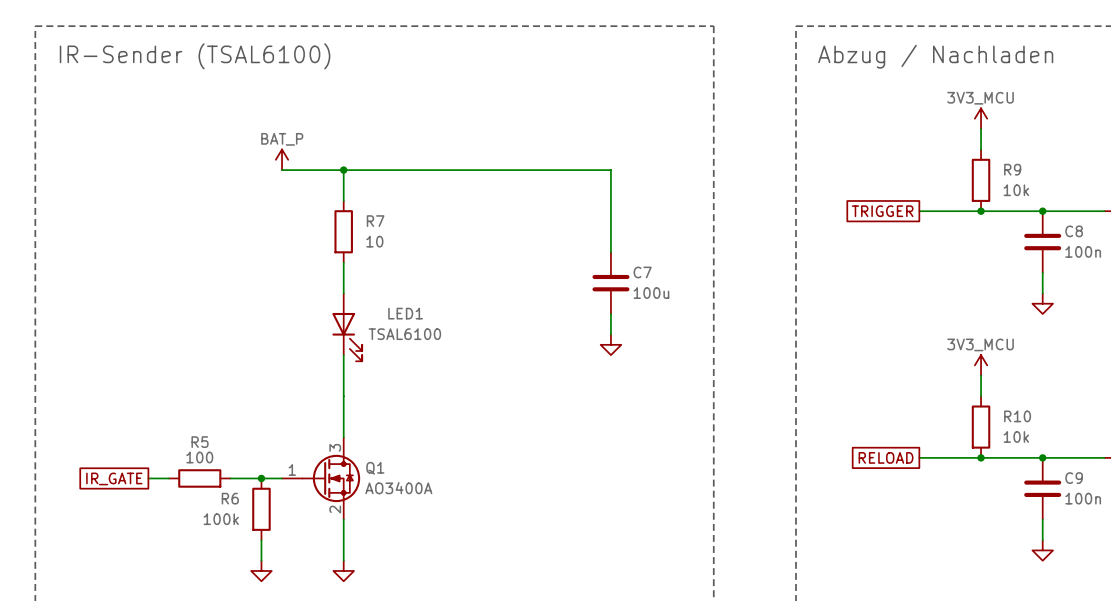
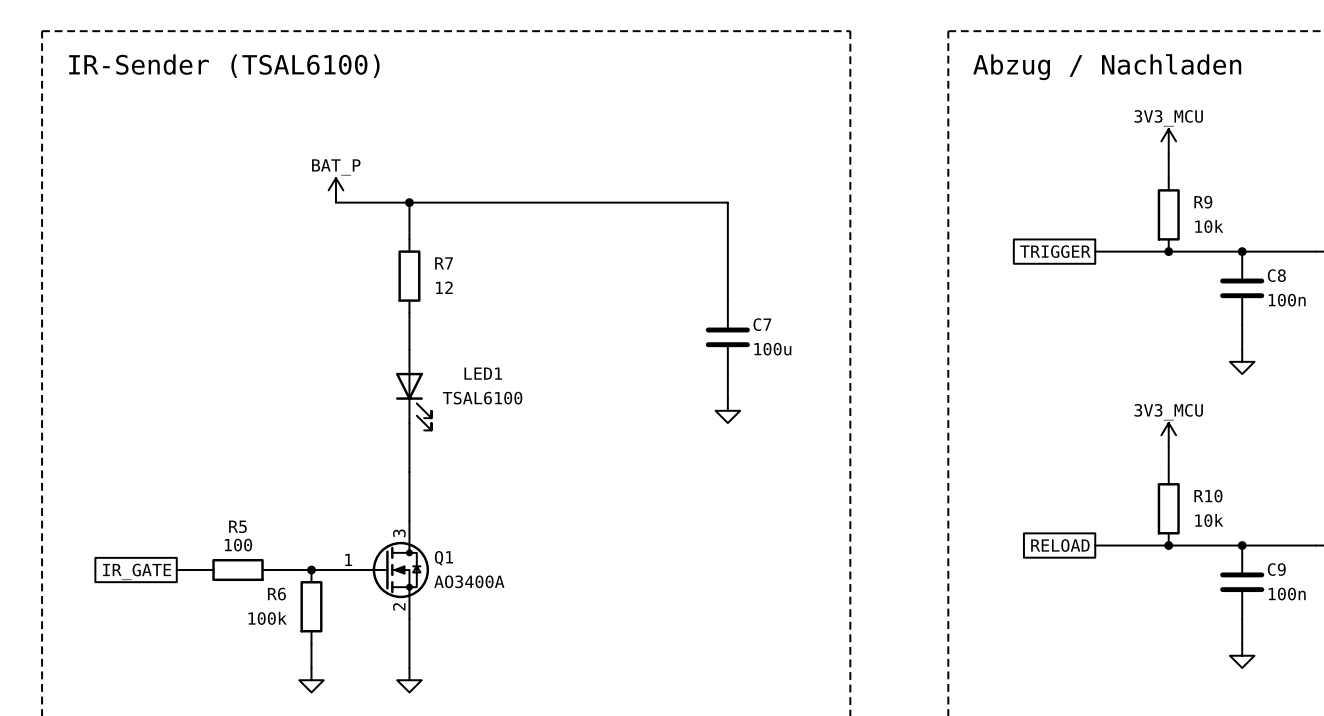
R7 value: 10 (374, 241) -> 12 (444, 287)

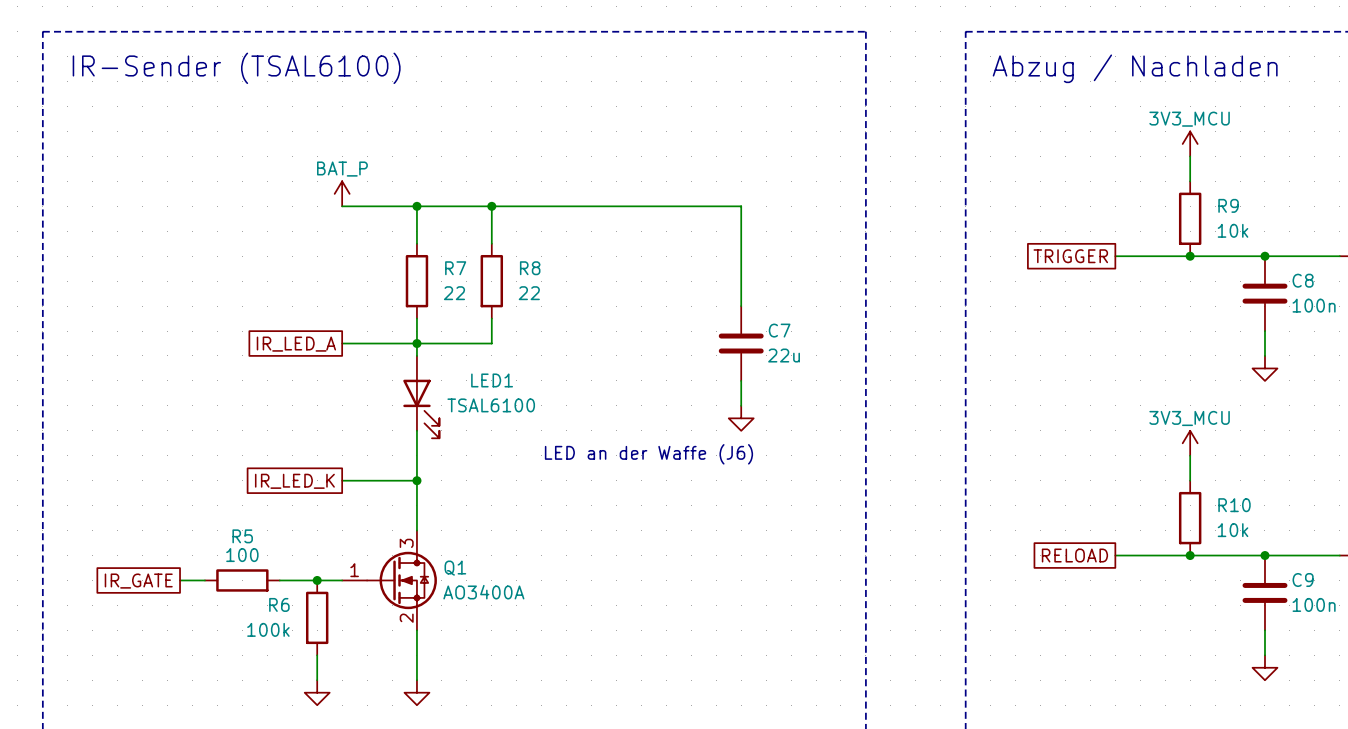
wire: none -> (491, 206) (491, 243)
junction: none -> (491, 206)
R8: none -> 22 (491, 281)
R7 value: 12 (444, 287) -> 22 (454, 293)
wire: none -> (491, 318) (491, 343) (342, 343)
junction: none -> (416, 343)
global label: none -> IR_LED_A (296, 344)
C7 value: 100u (772, 349) -> 22u (784, 355)
text: none -> LED an der Waffe (J6) (648, 454)
wire: none -> (342, 480) (416, 480)
junction: none -> (416, 480)
global label: none -> IR_LED_K (294, 481)

